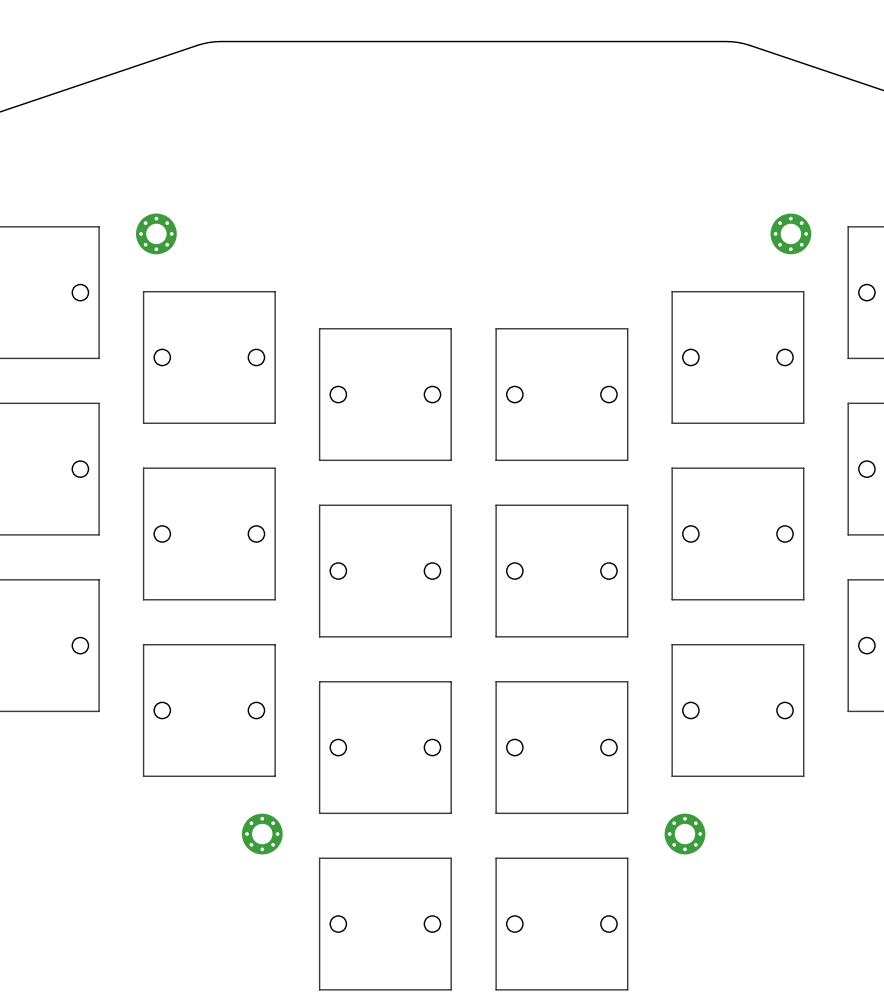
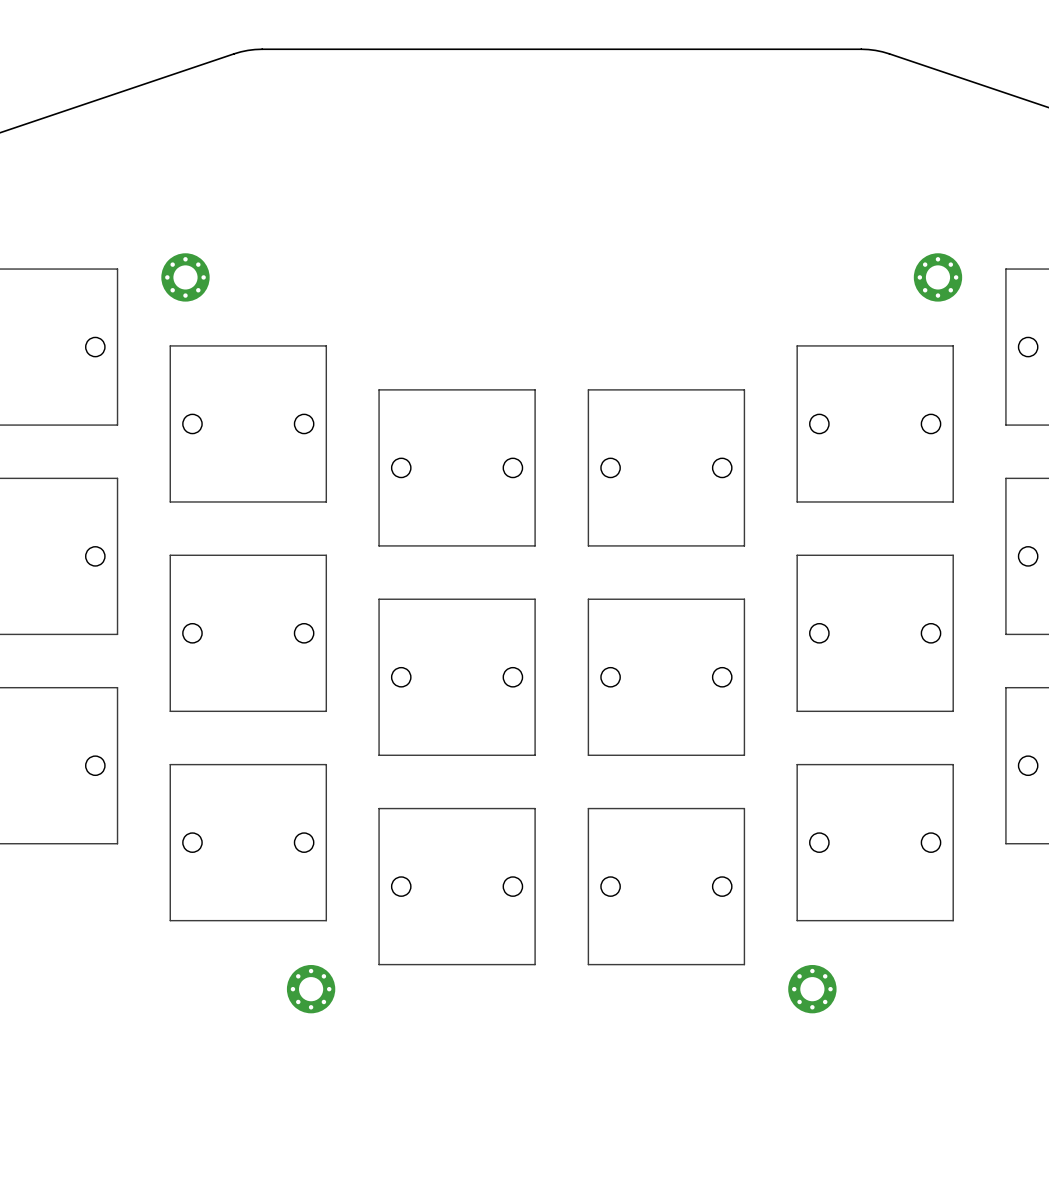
part: (385, 924) -> none
part: (561, 924) -> none

